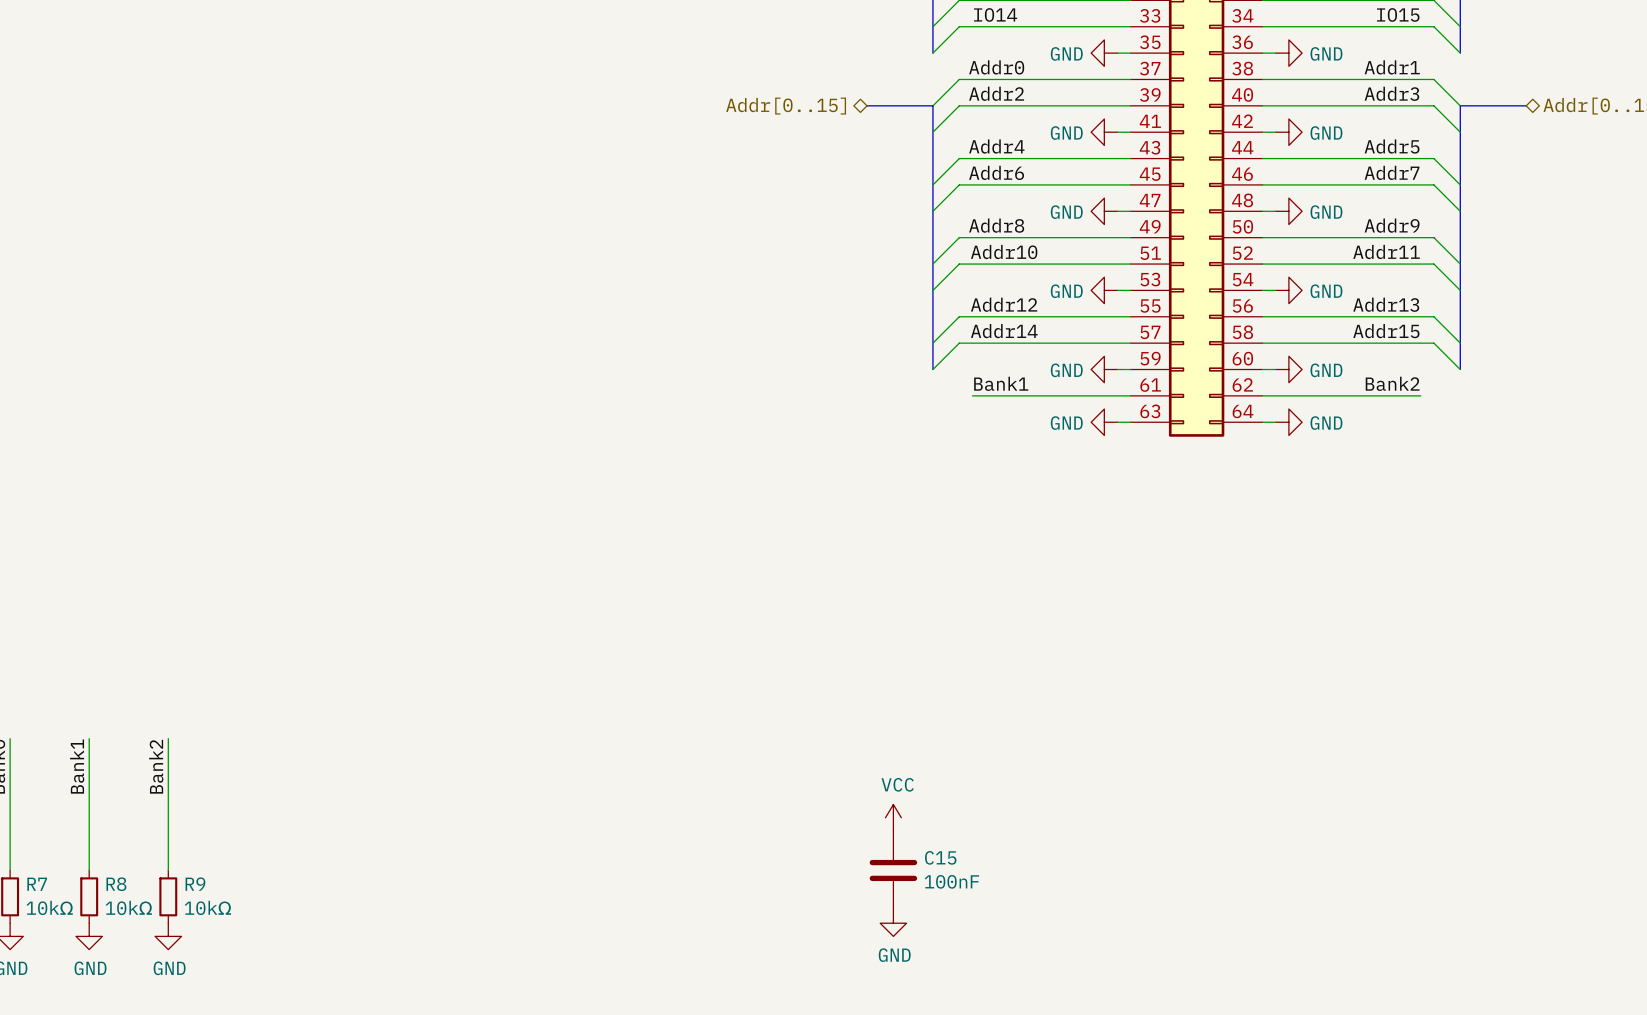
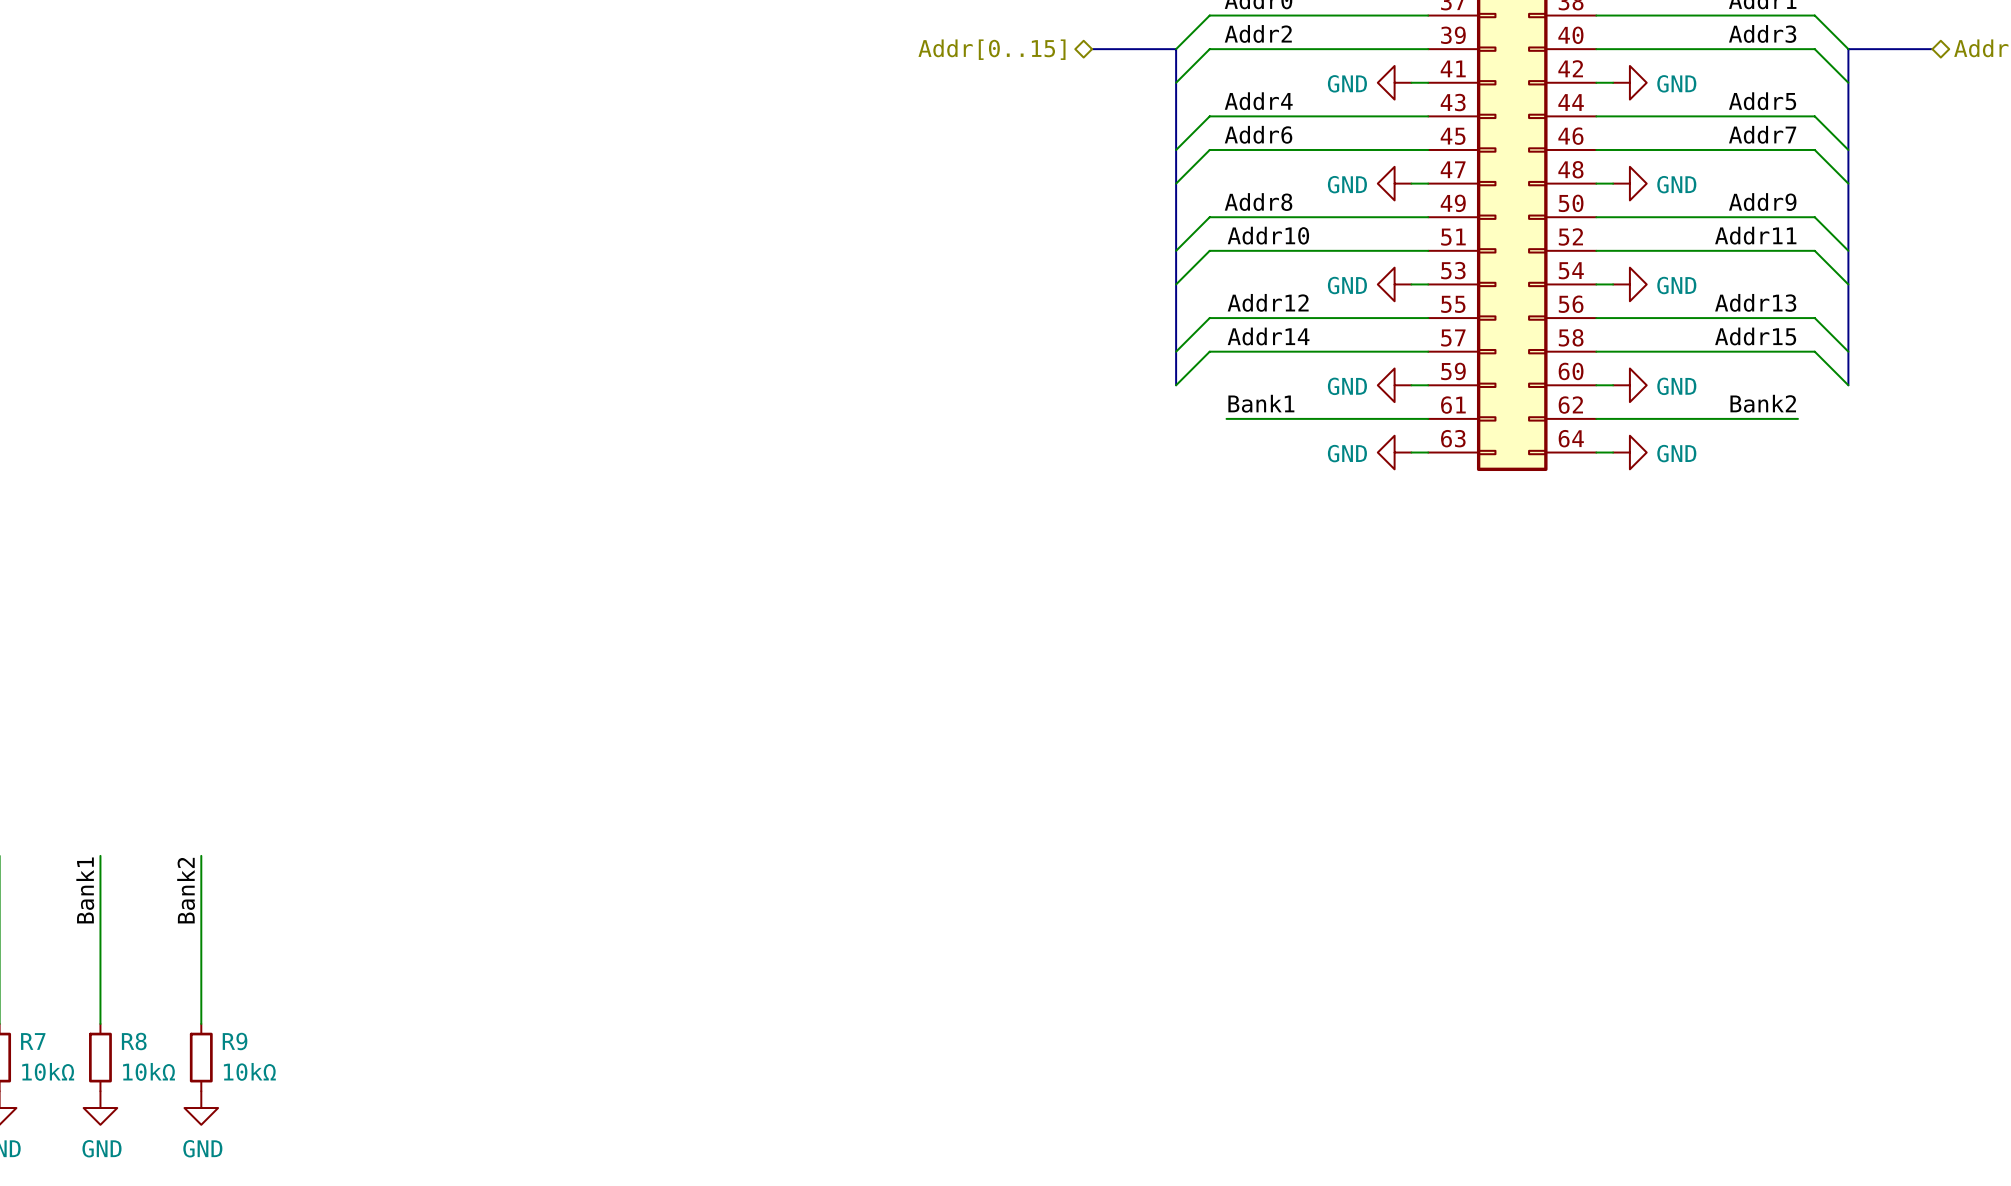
power symbol: VCC (893, 817) -> none
C15: 100nF (893, 870) -> none
power symbol: GND (893, 923) -> none

